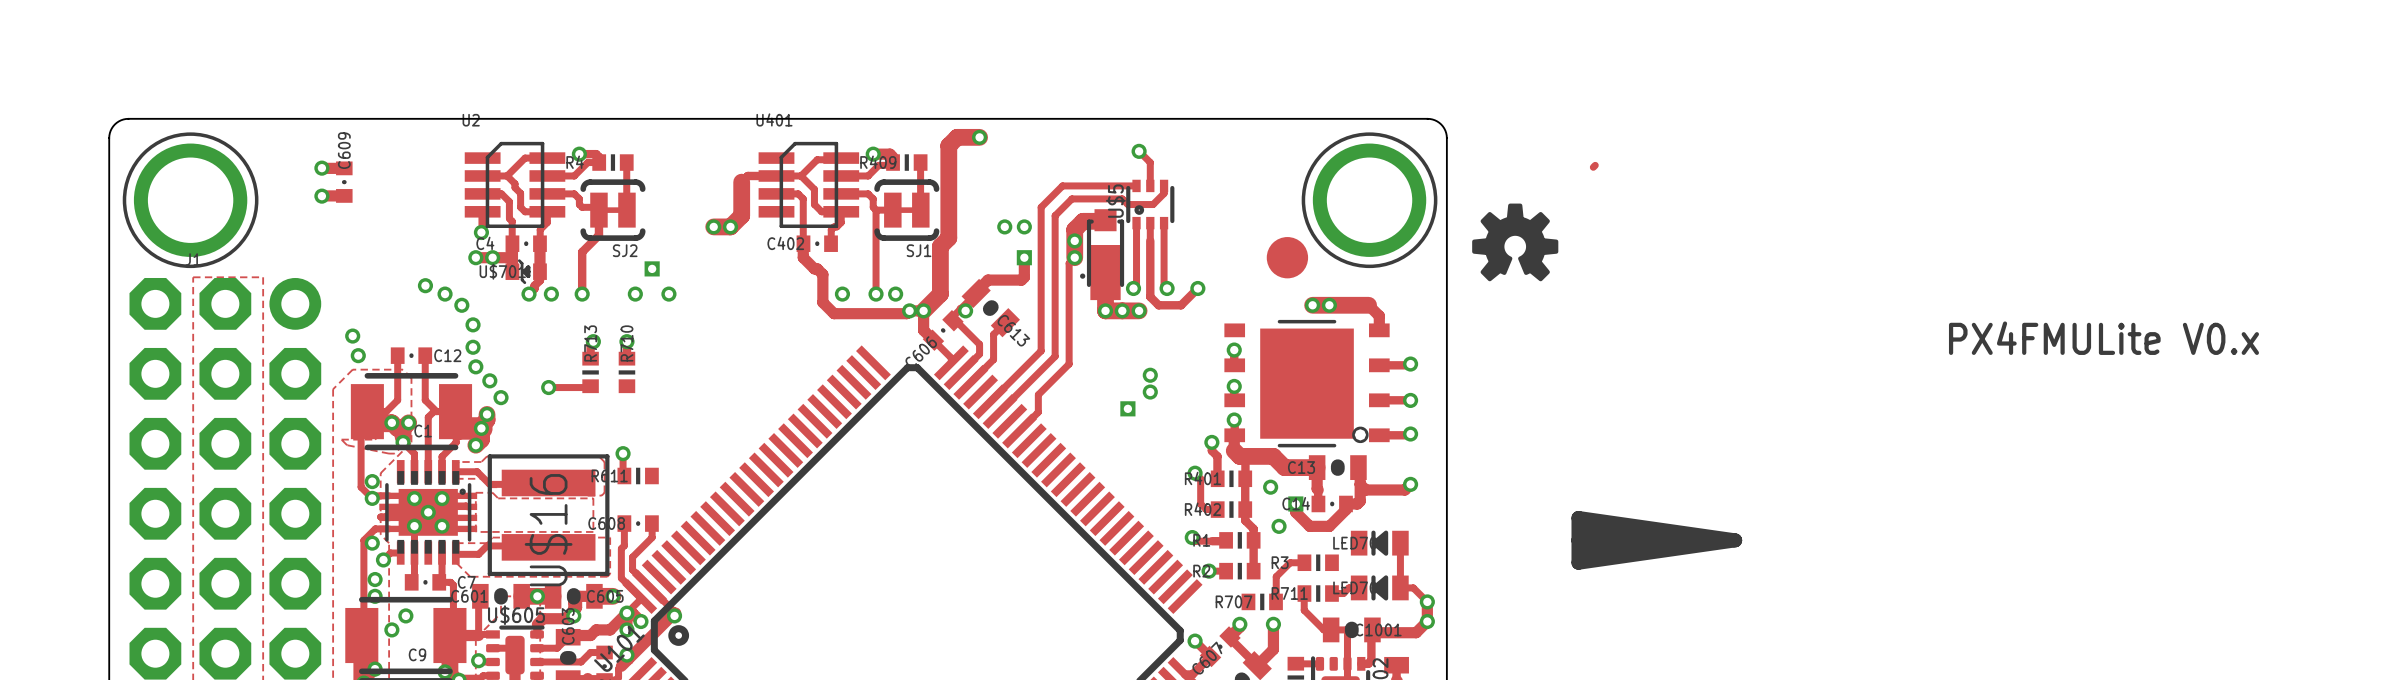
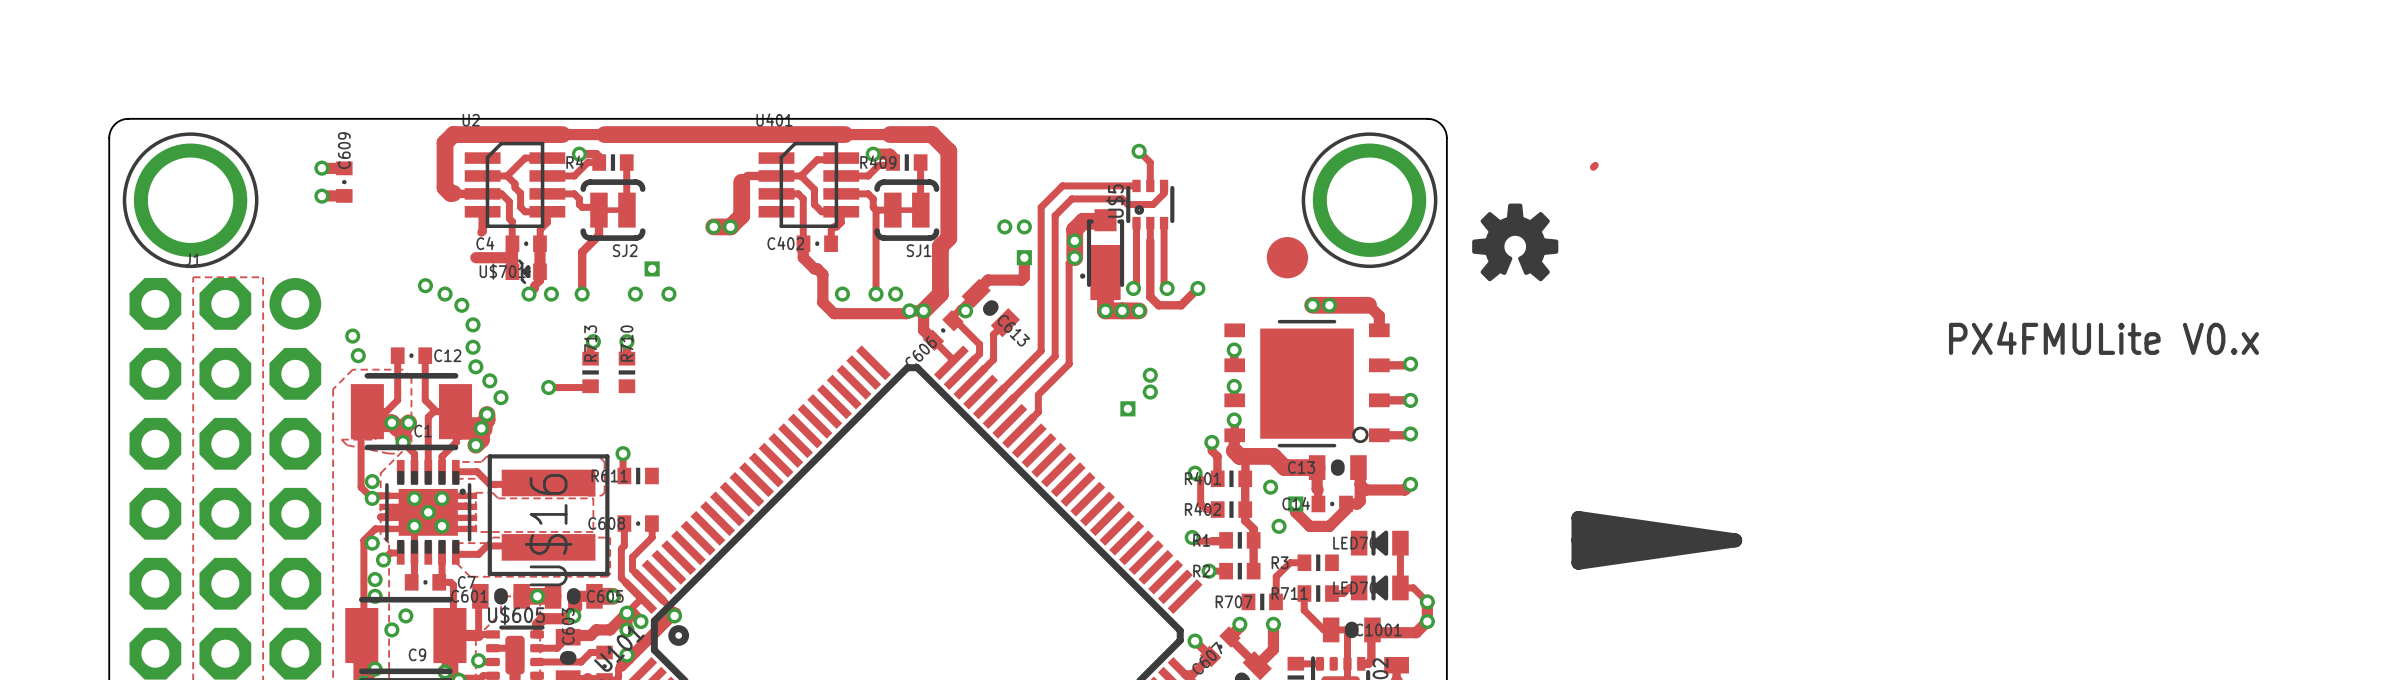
track: (979, 137) (957, 137) (948, 145) (948, 151) -> (482, 193) (454, 193) (445, 187) (445, 142) (453, 134) (932, 134) (948, 151)
via: (979, 137) -> none
via: (481, 232) -> none
via: (475, 257) -> none
via: (492, 257) -> none

